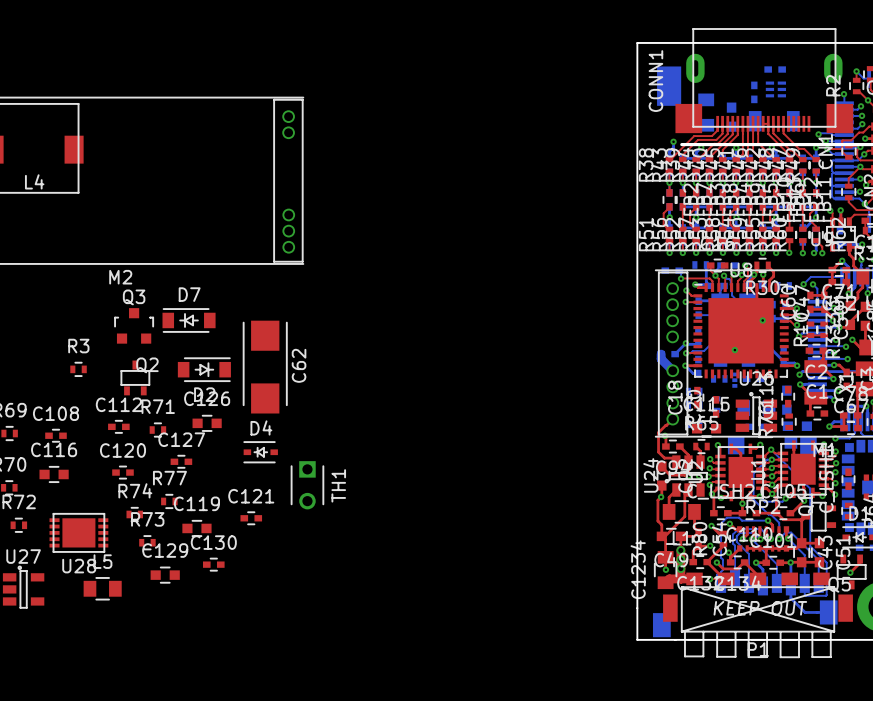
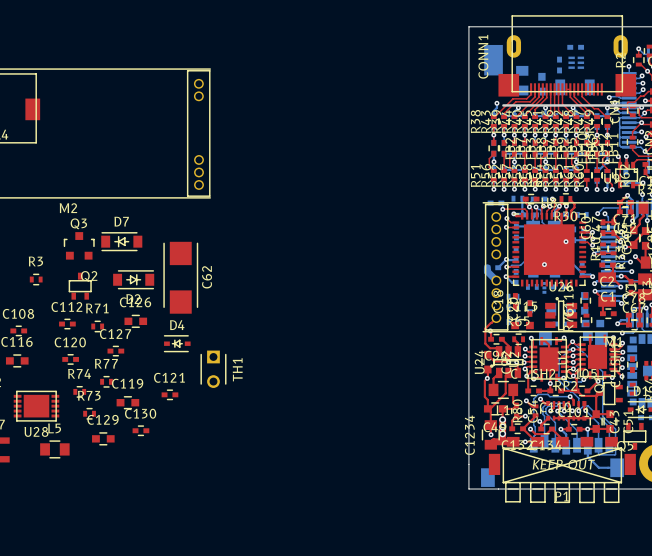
top track: (849, 247) (849, 254) (853, 258) (853, 265) (862, 276) -> none
top track: (860, 559) (860, 562) (850, 572) -> none
via: (850, 572) -> none

